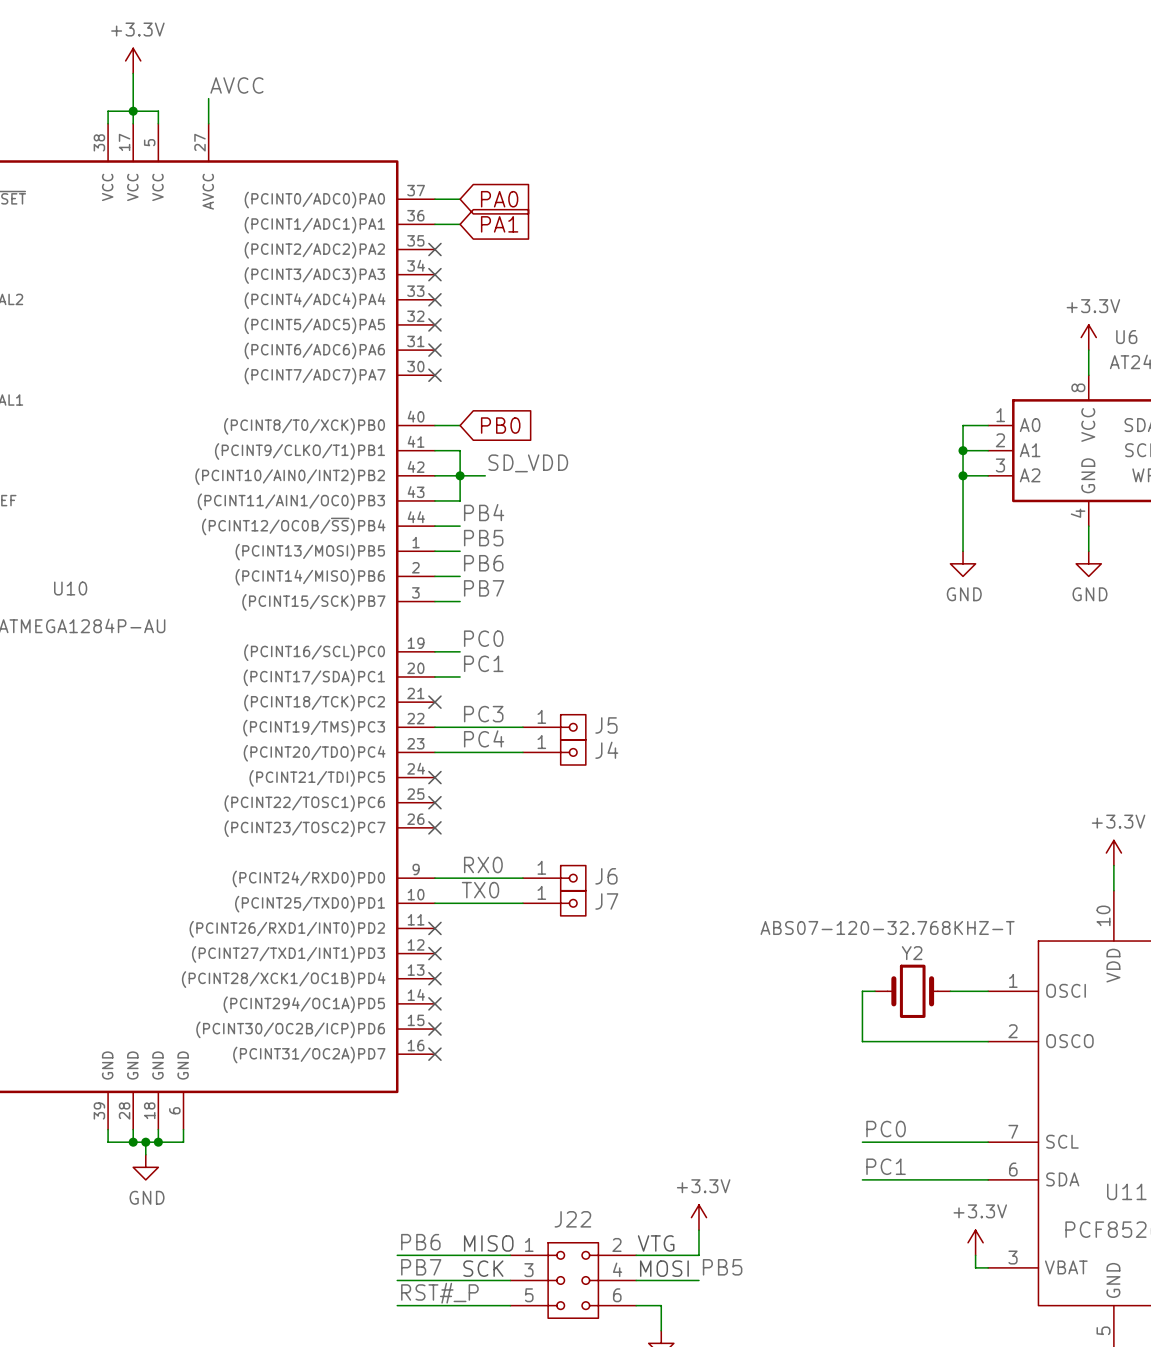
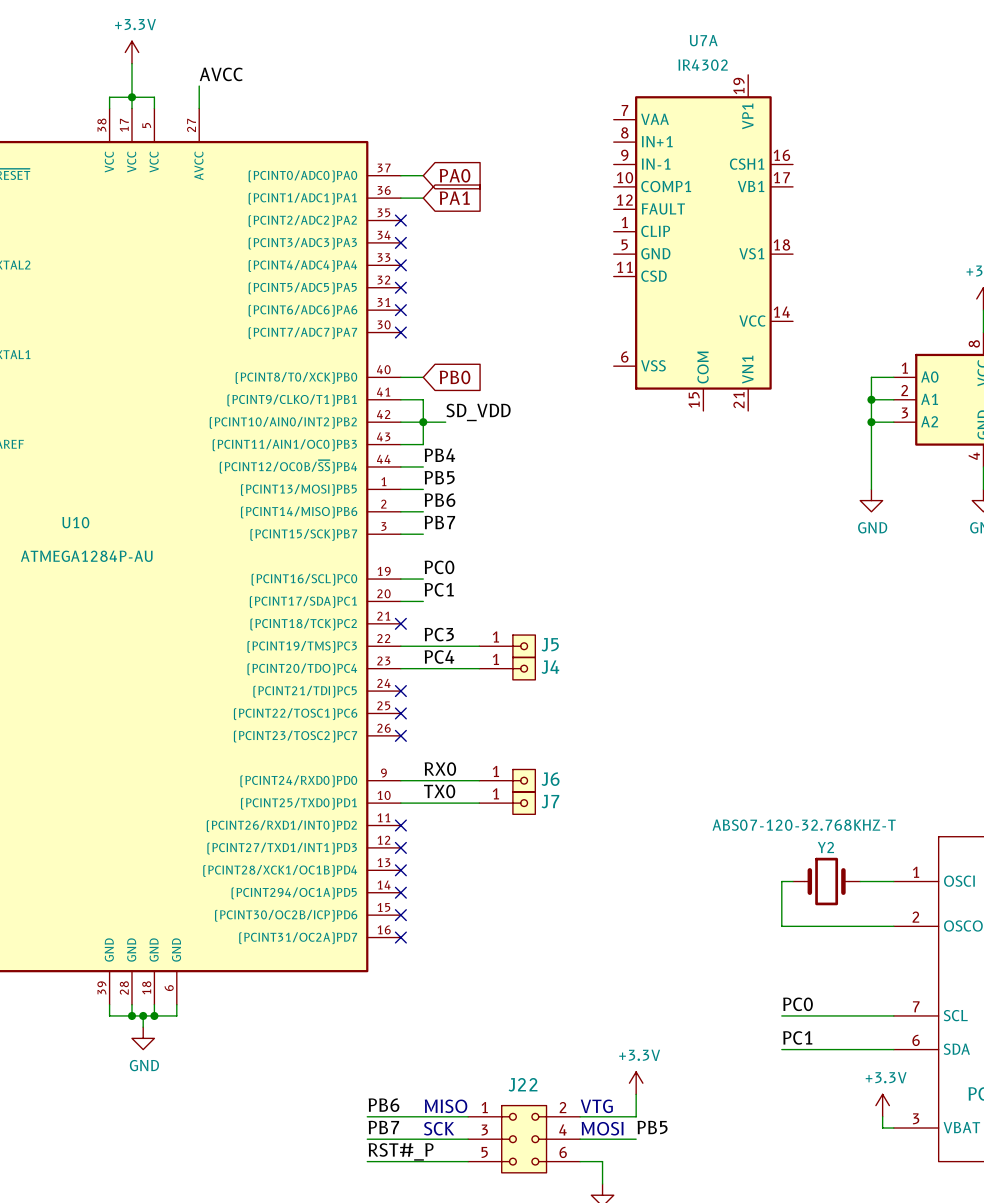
U7A: none -> IR4302 (703, 242)

